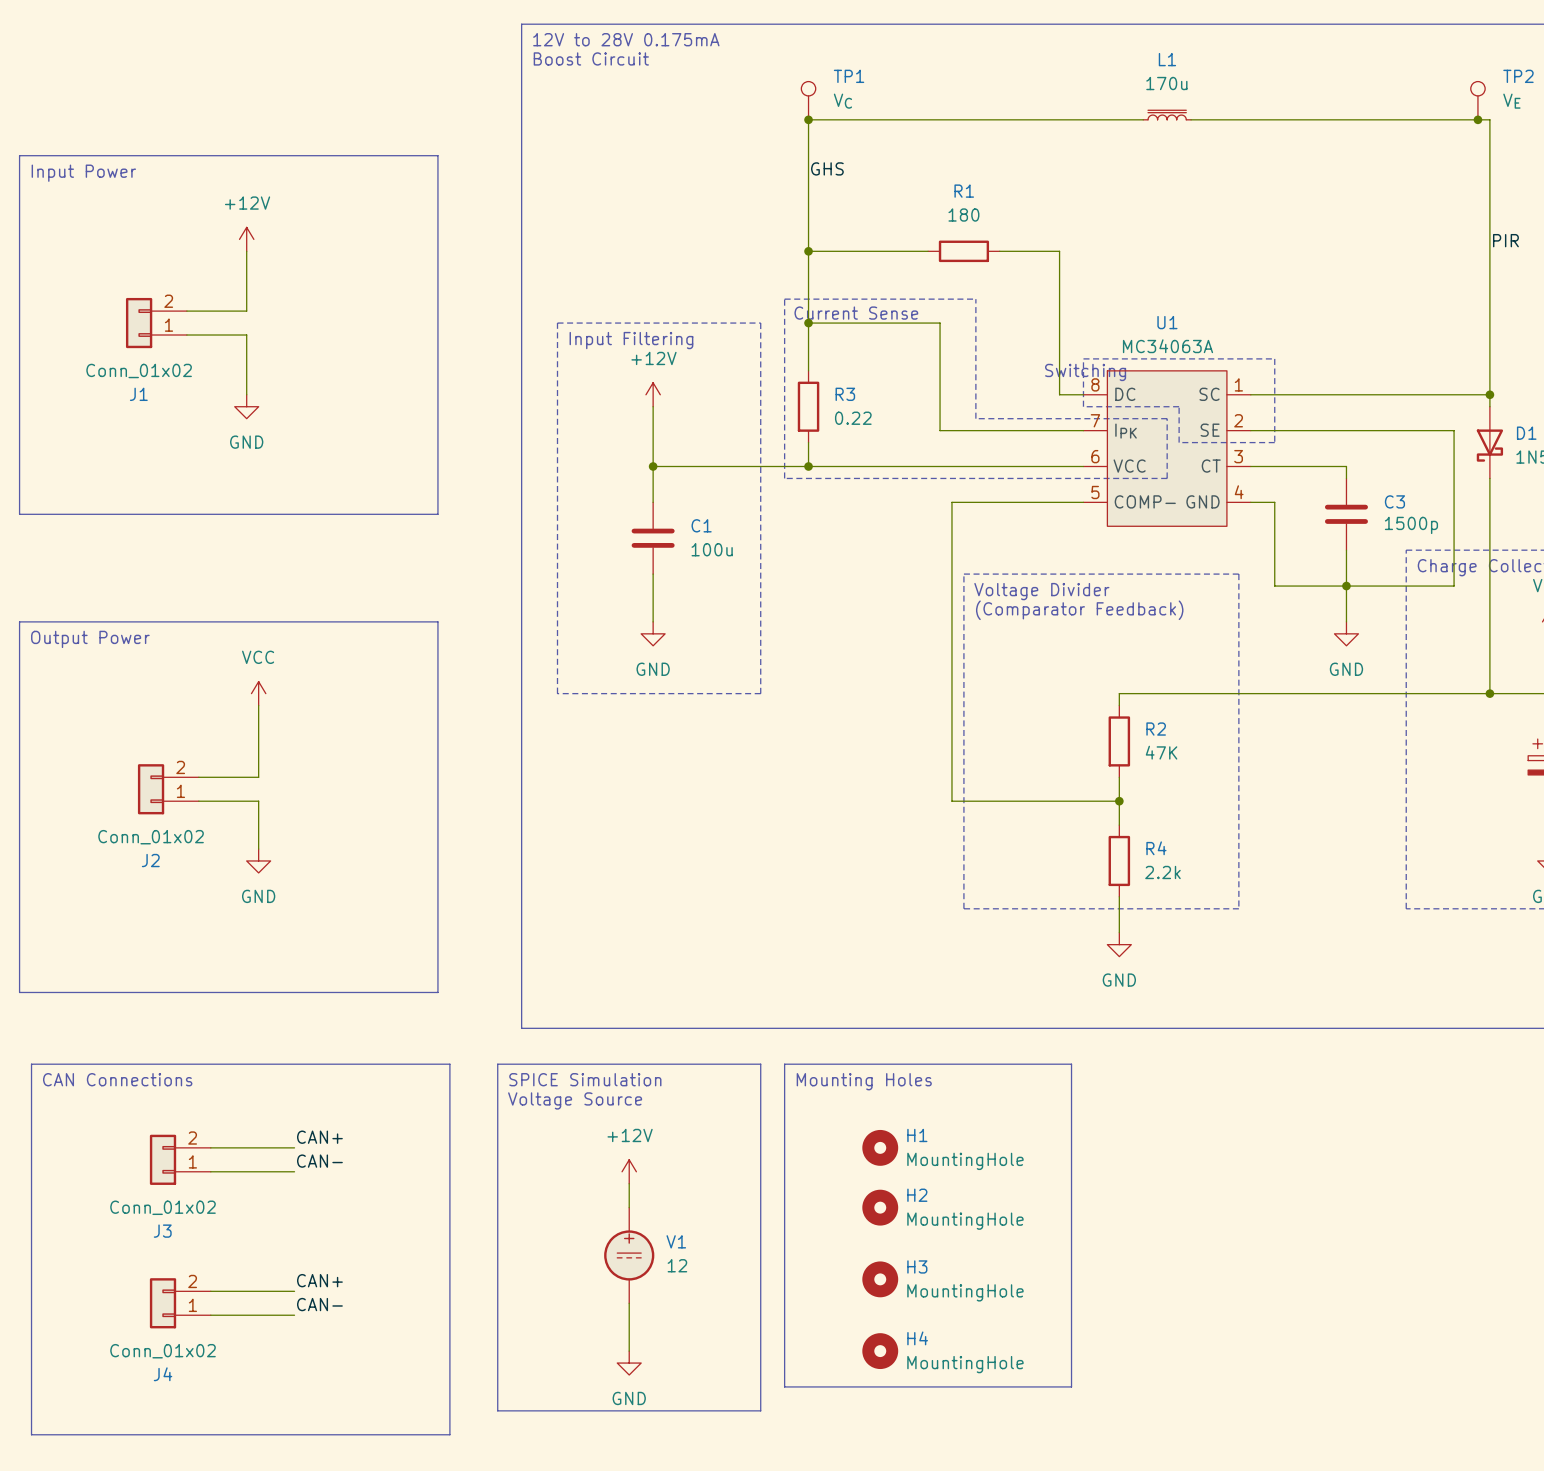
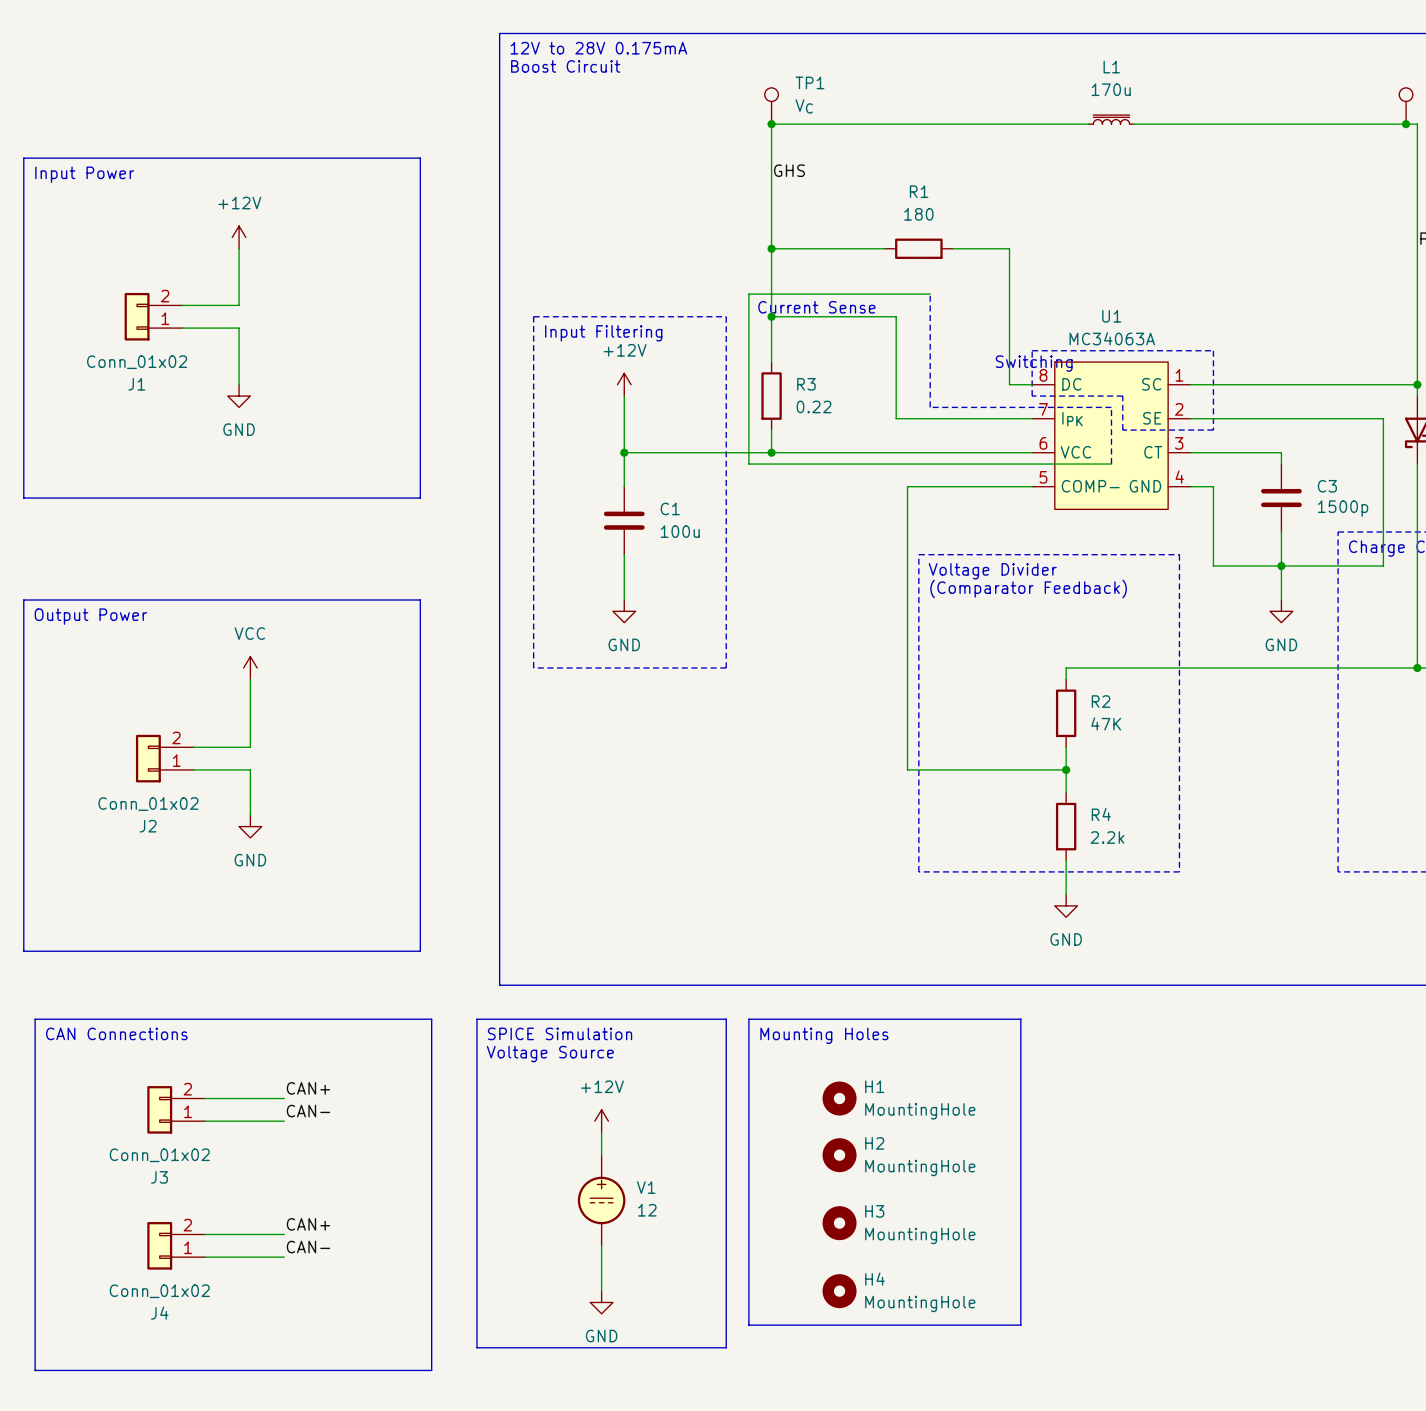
line: (975, 299) (784, 299) (784, 478) (1167, 478) -> none

